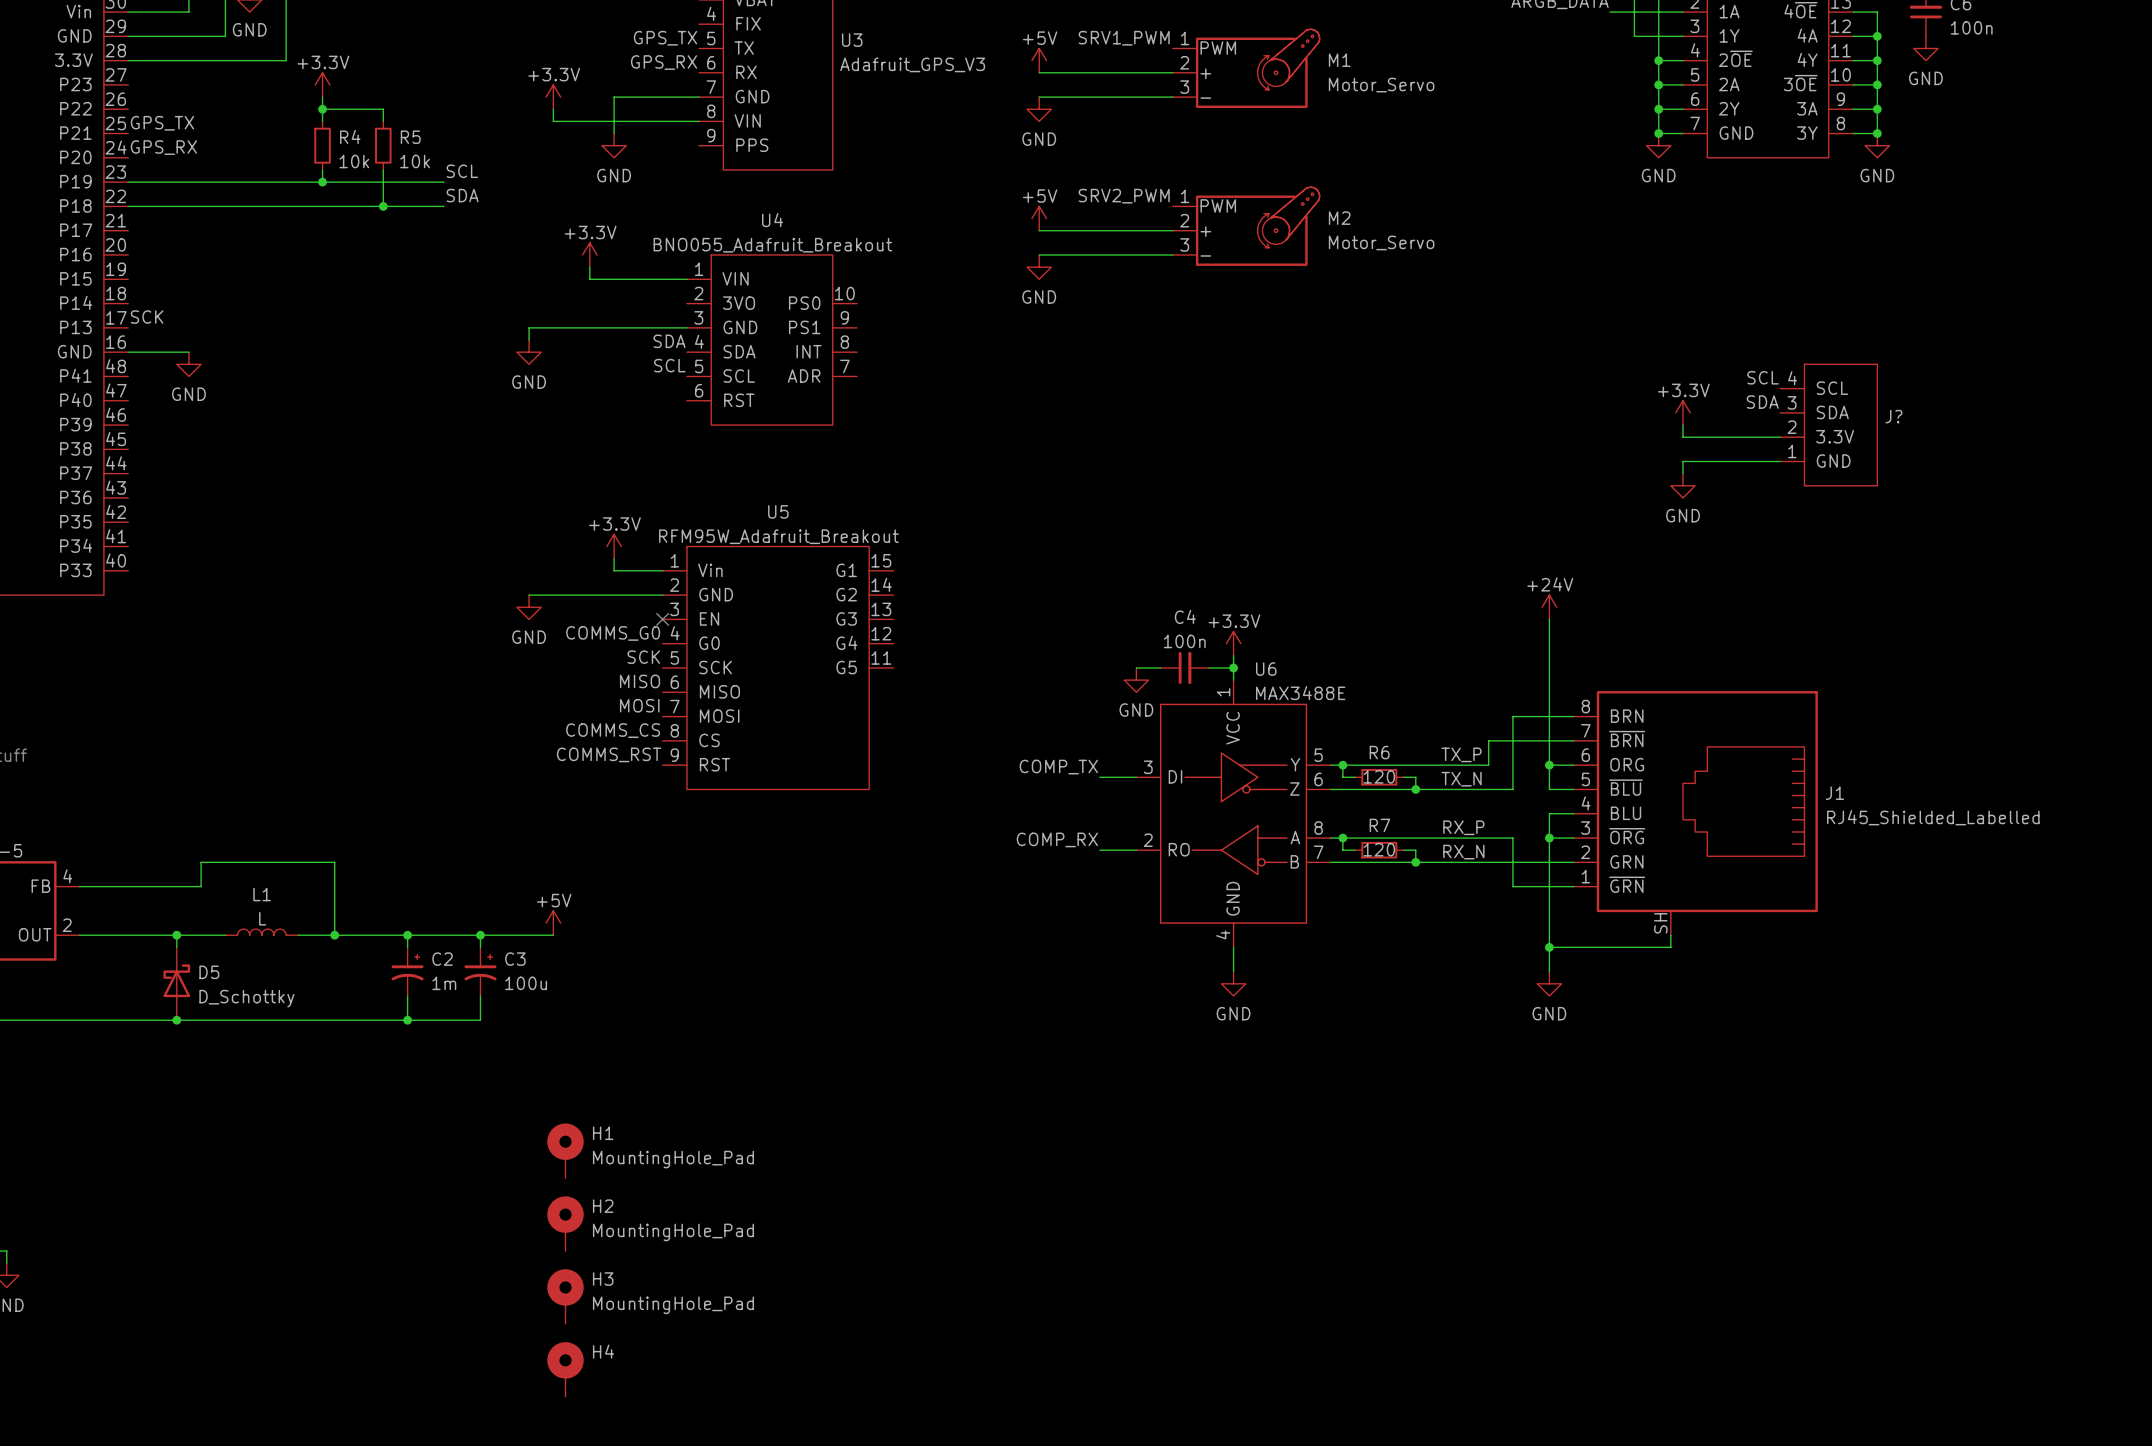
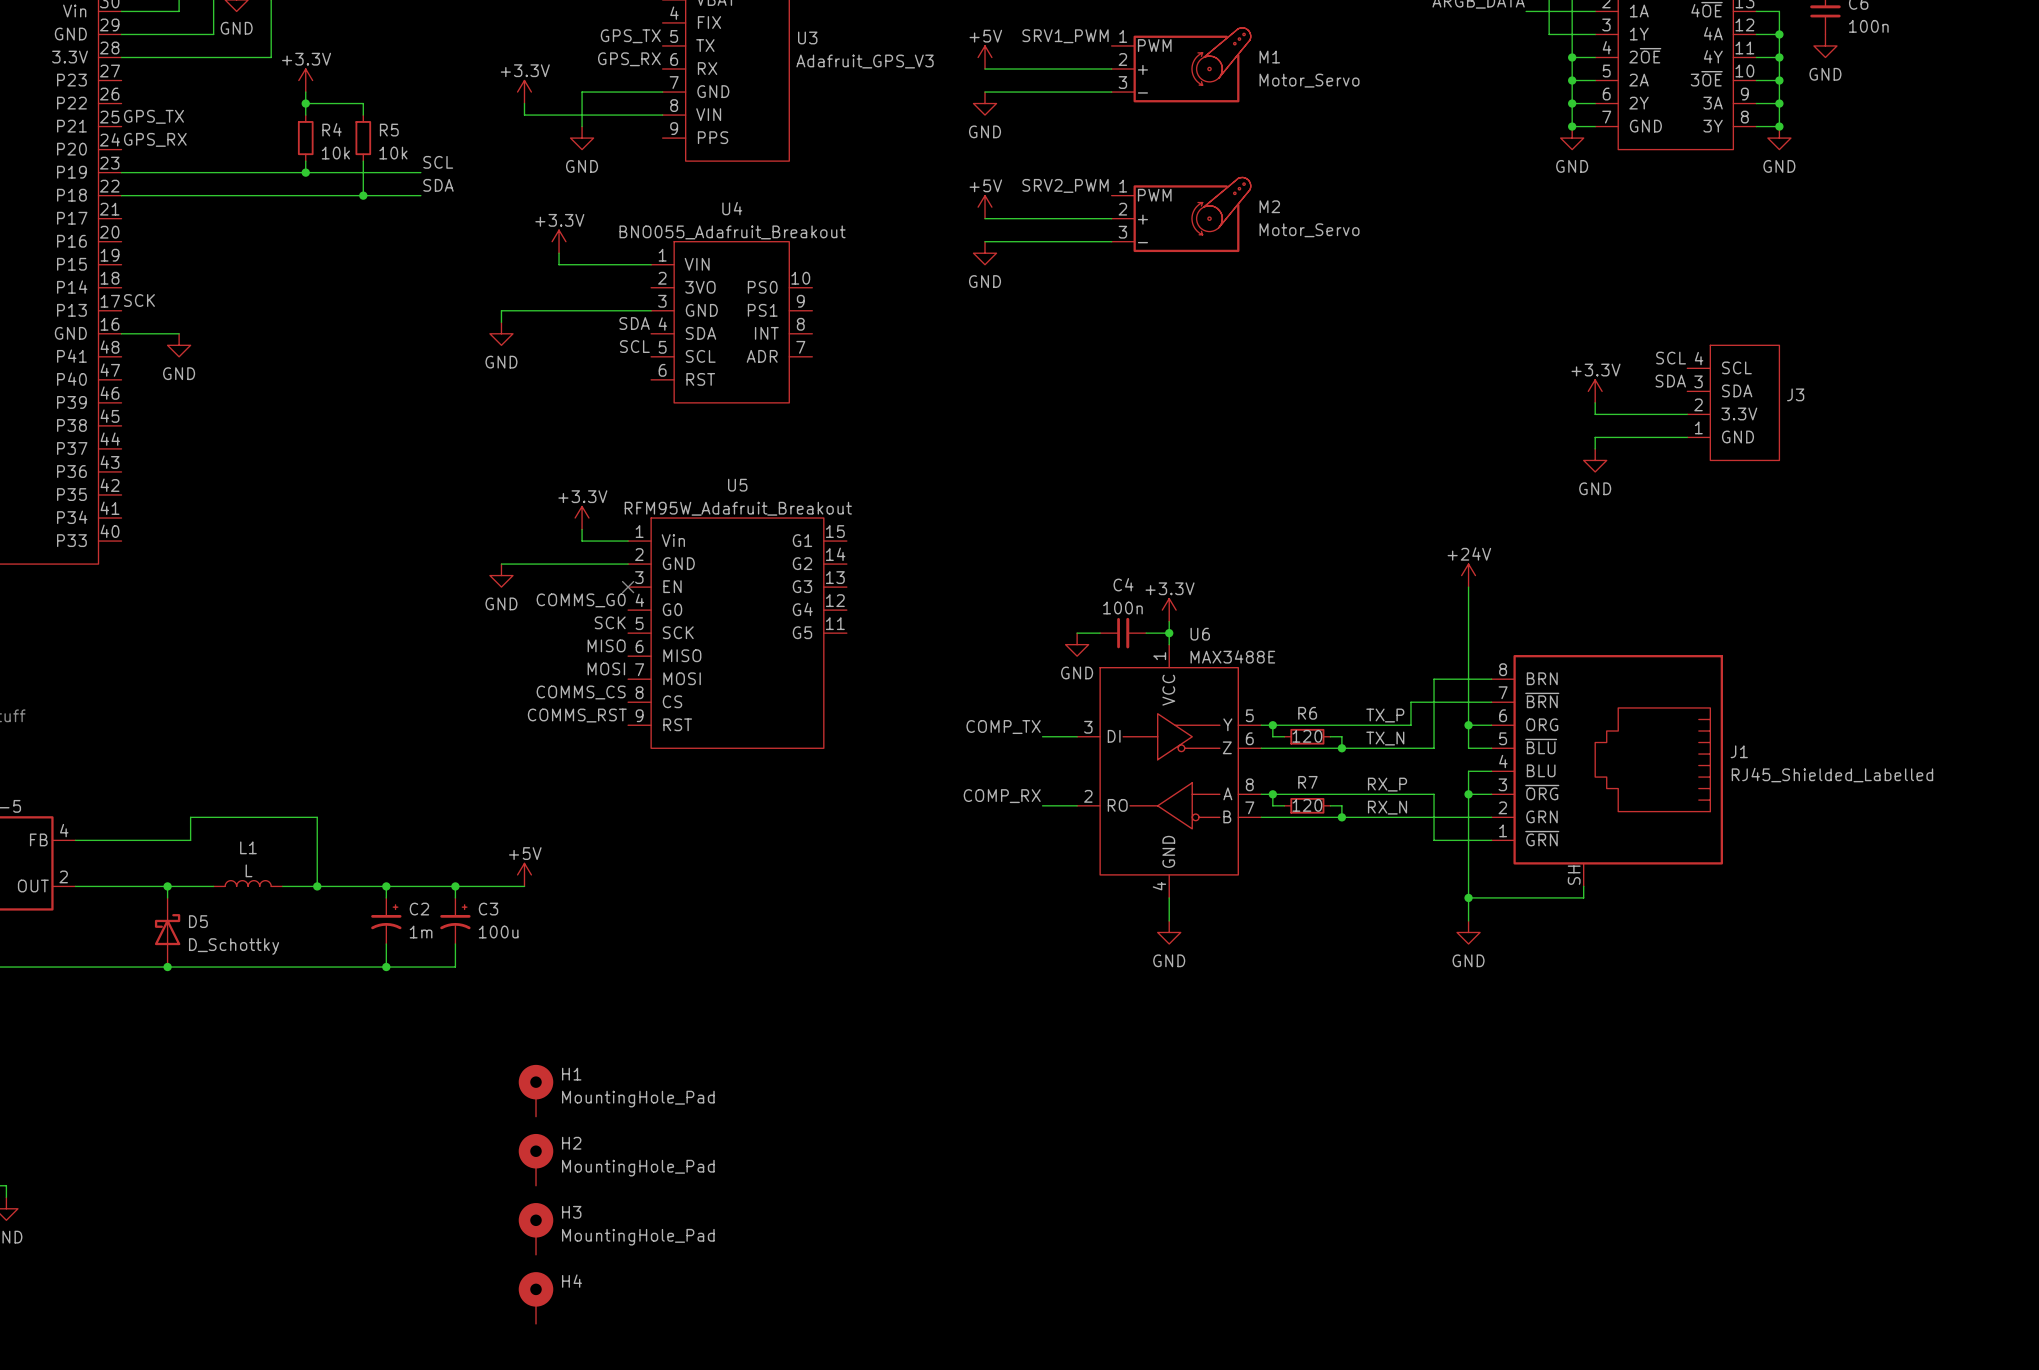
J? name: J? (1893, 416) -> J3 (1795, 394)

